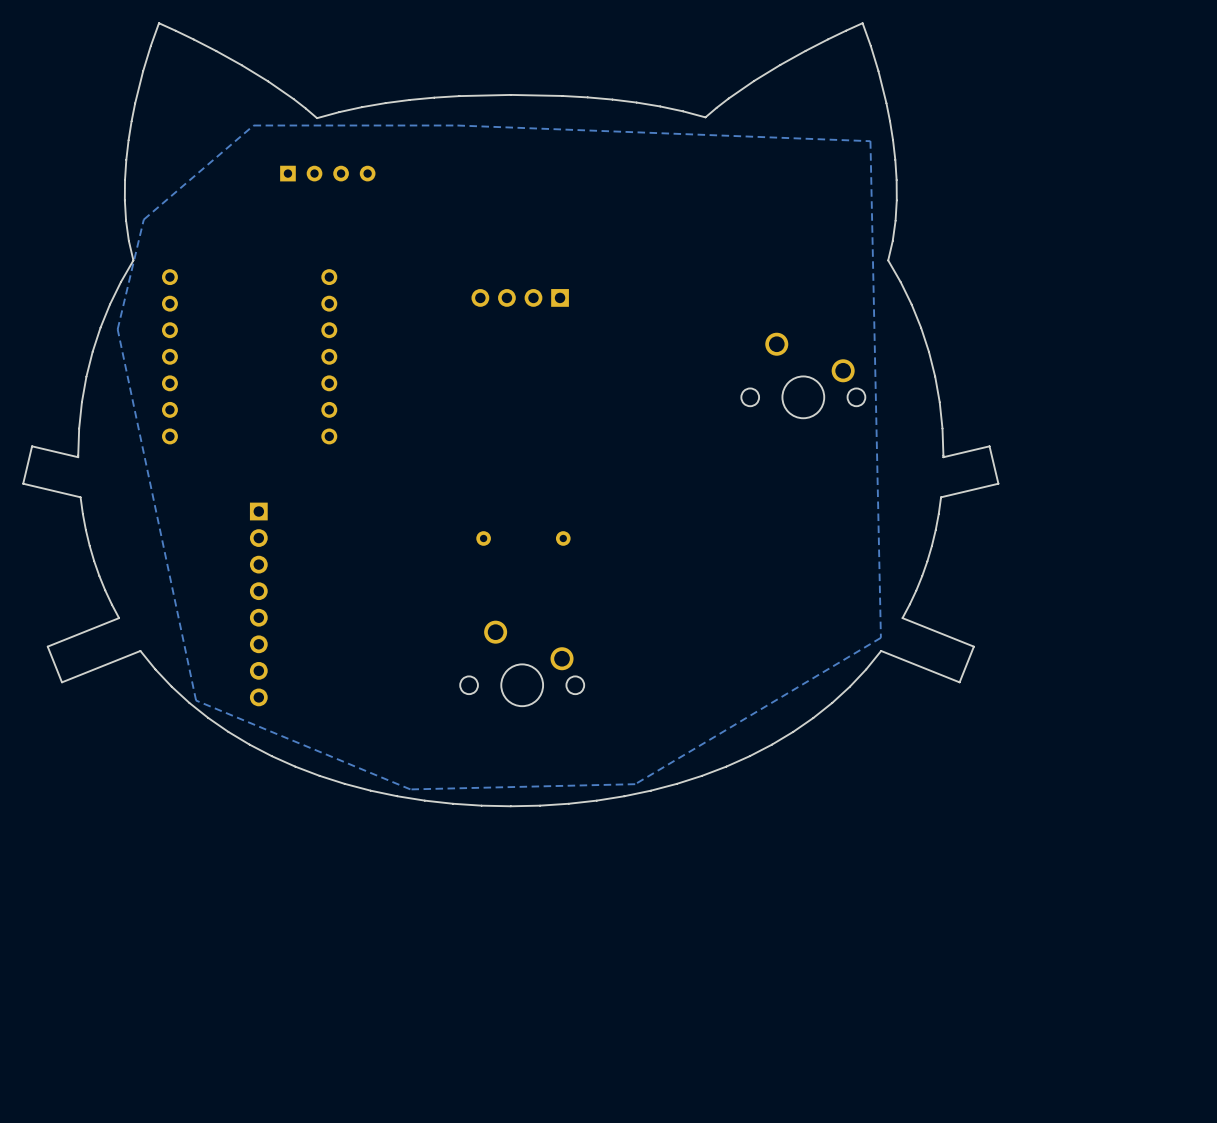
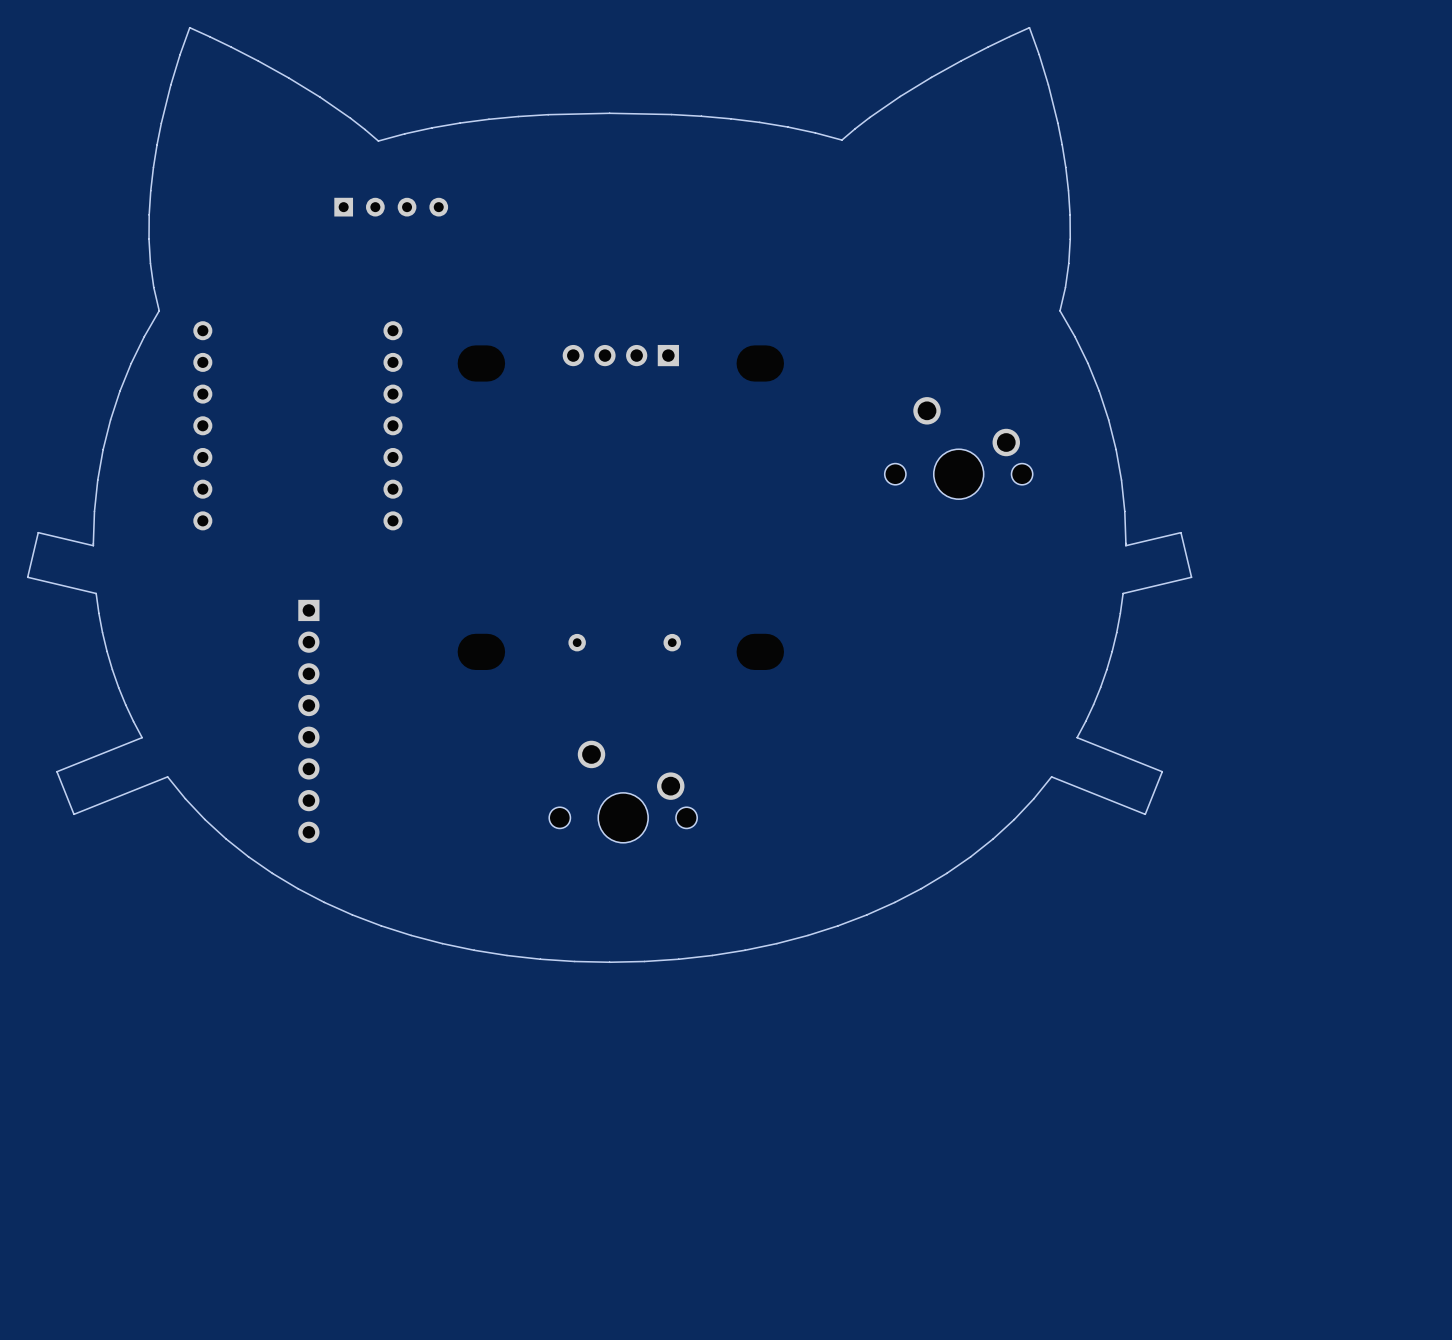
zone outline: (457, 125) (253, 125) (143, 219) (117, 329) (196, 700) (410, 789) (635, 784) (880, 637) (870, 141) (457, 125) -> none

